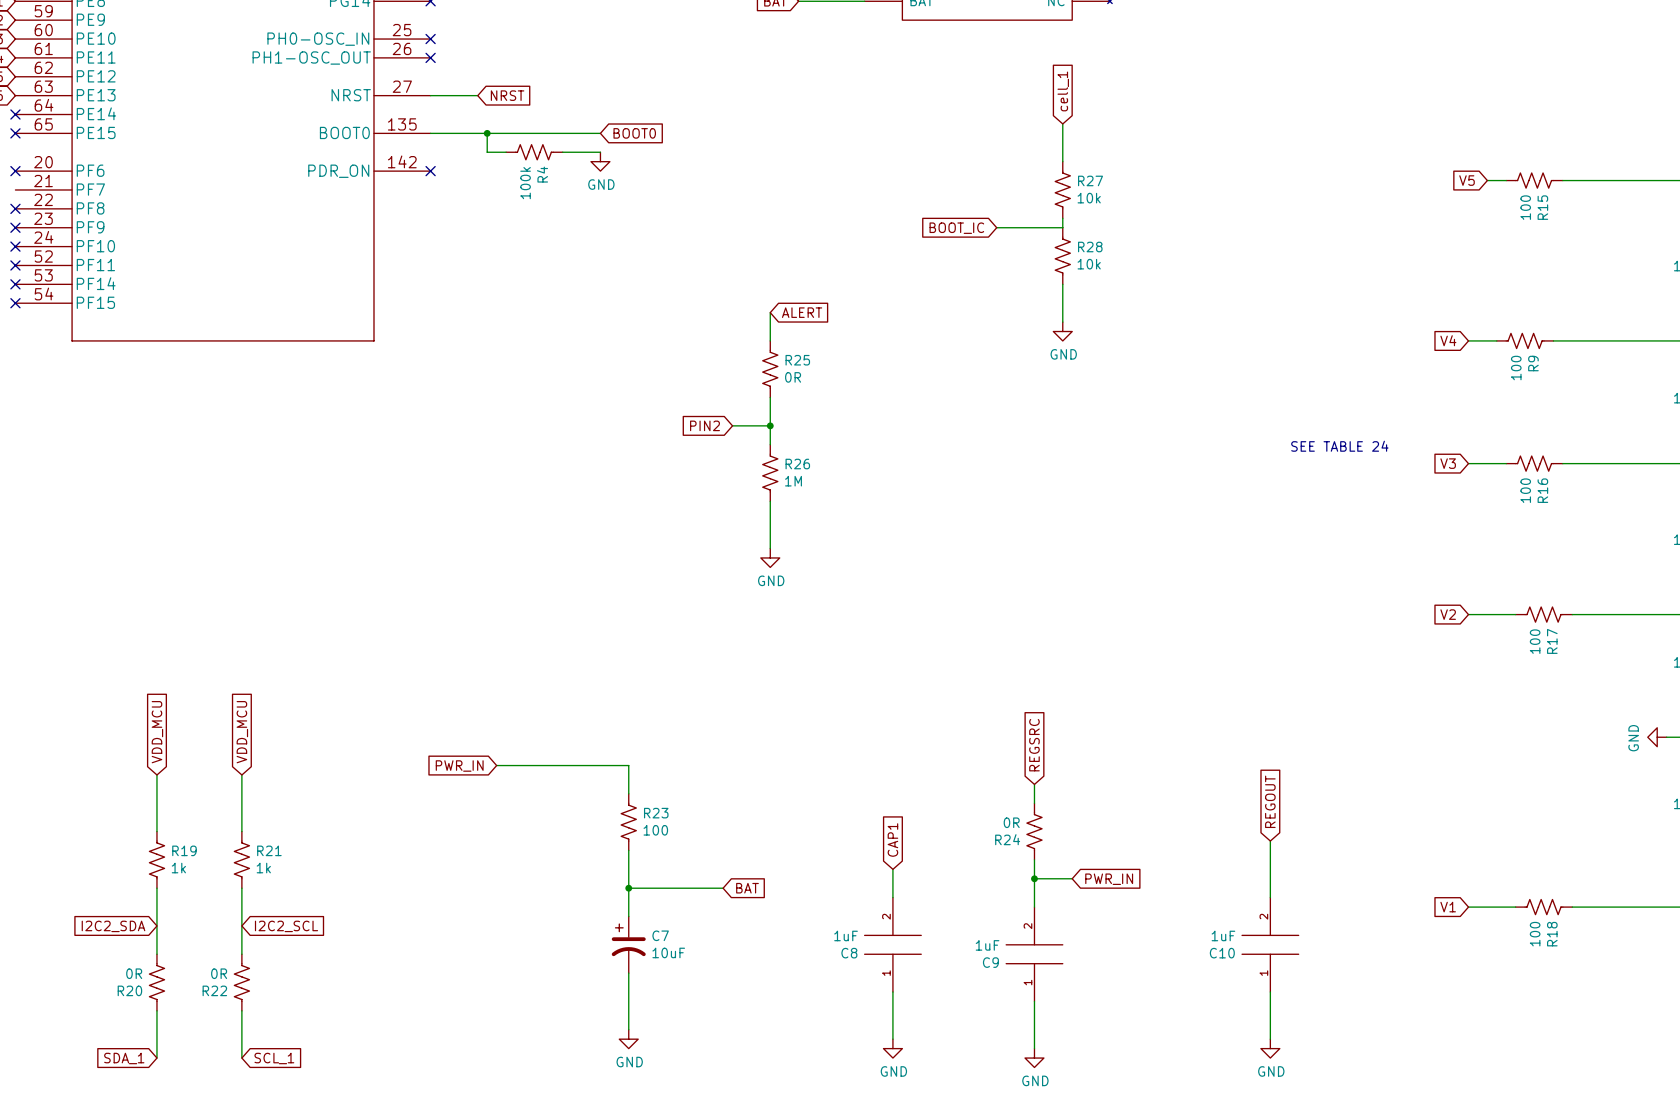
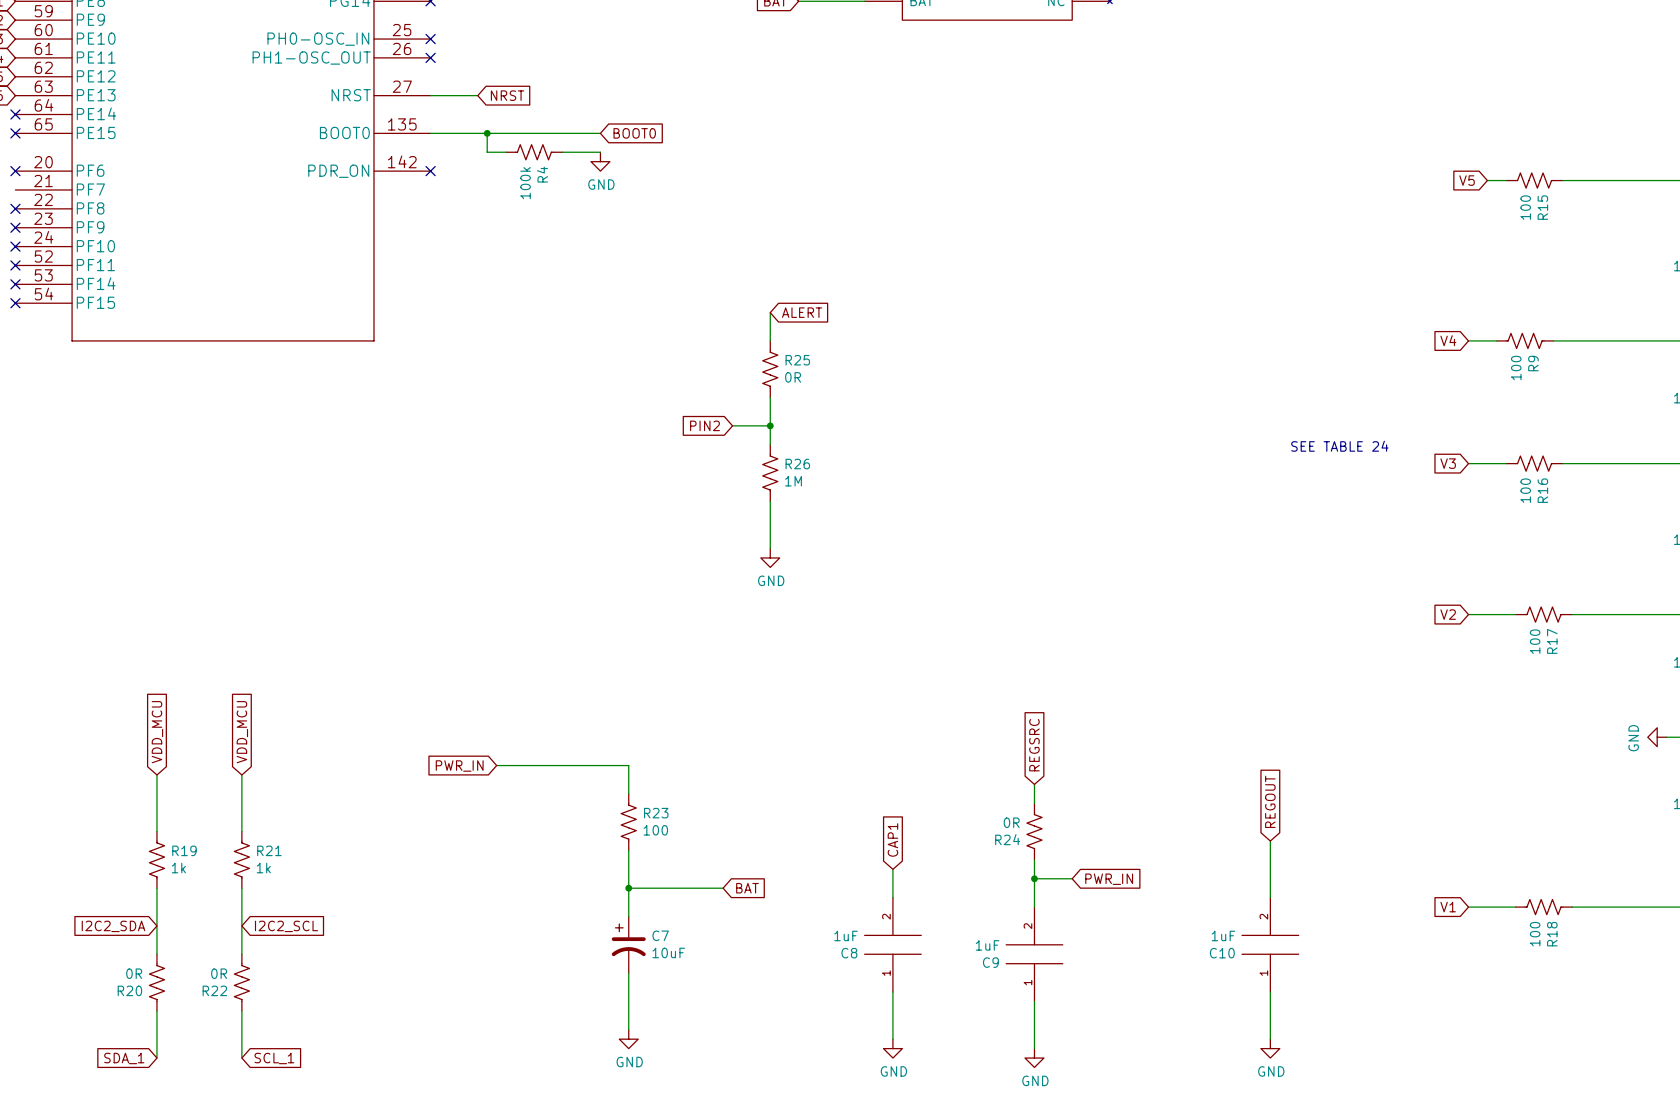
global label: cell_1 (1063, 91) -> none
wire: (1062, 123) (1062, 161) -> none
R27: 10k (1062, 189) -> none
wire: (1062, 218) (1062, 227) (996, 227) -> none
global label: BOOT_IC (956, 228) -> none
R28: 10k (1062, 256) -> none
wire: (1062, 284) (1062, 322) -> none
power symbol: GND (1062, 331) -> none

